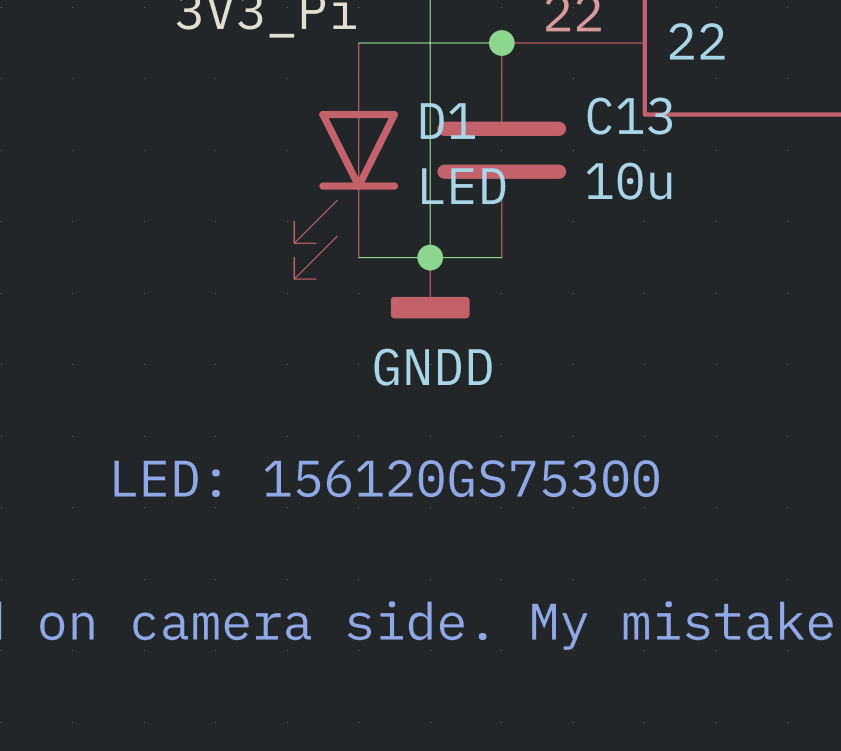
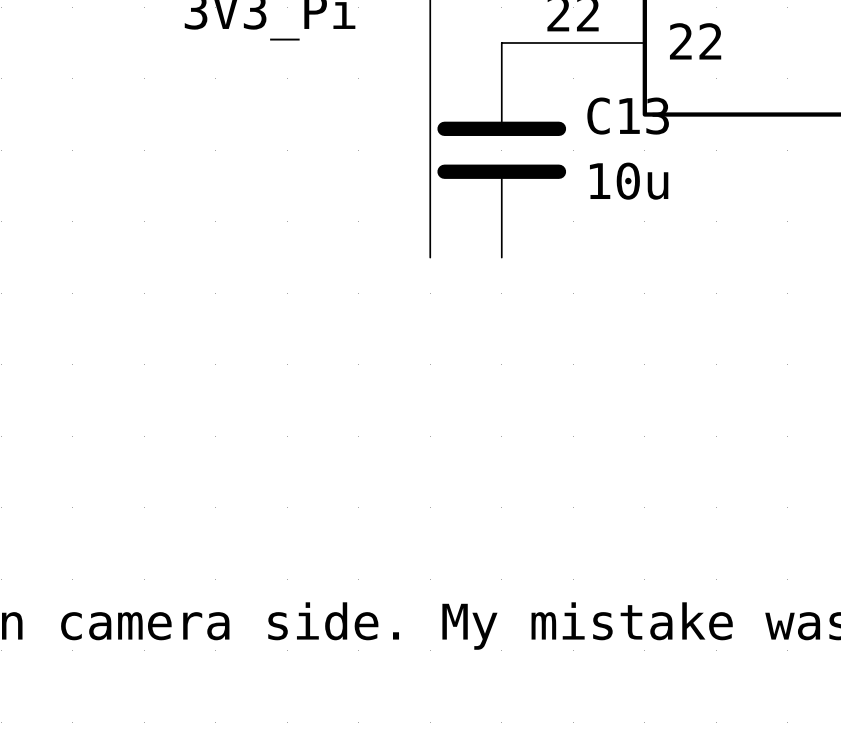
wire: (358, 42) (501, 42) -> none
junction: (501, 42) -> none
D1: LED (346, 161) -> none
wire: (358, 257) (501, 257) -> none
junction: (430, 257) -> none
power symbol: GNDD (430, 287) -> none
text: LED: 156120GS75300 (386, 478) -> none

